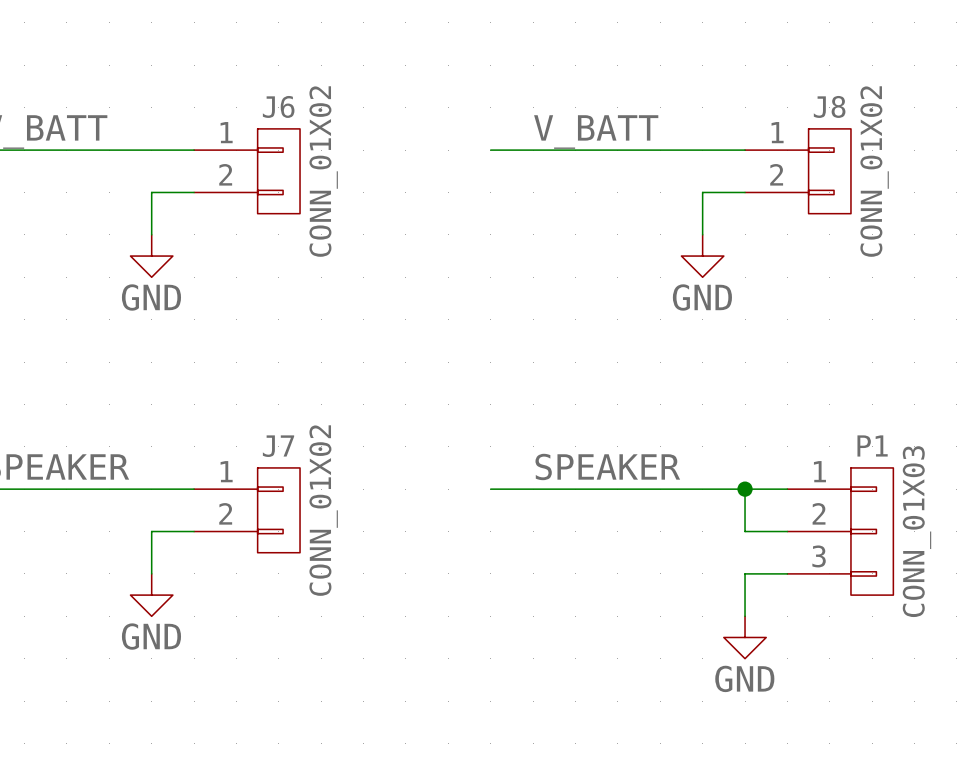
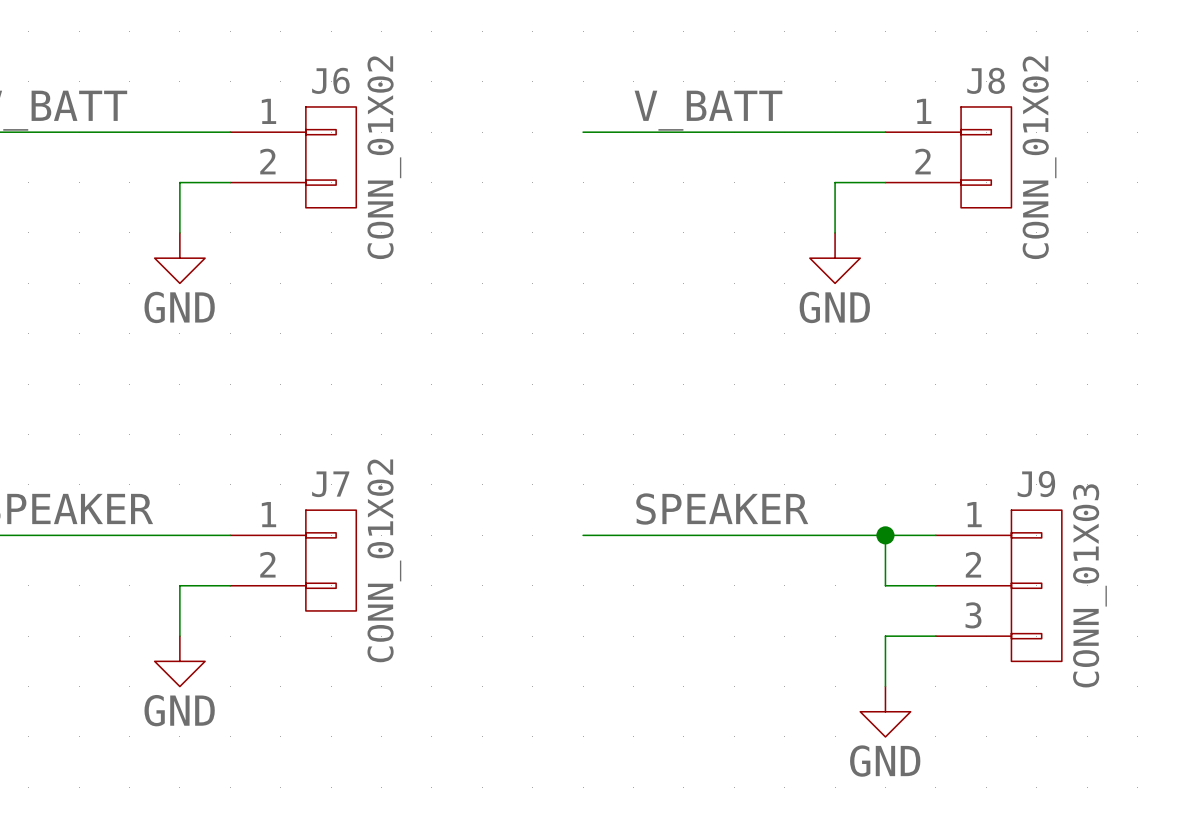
P1 name: P1 (872, 445) -> J9 (1036, 484)

